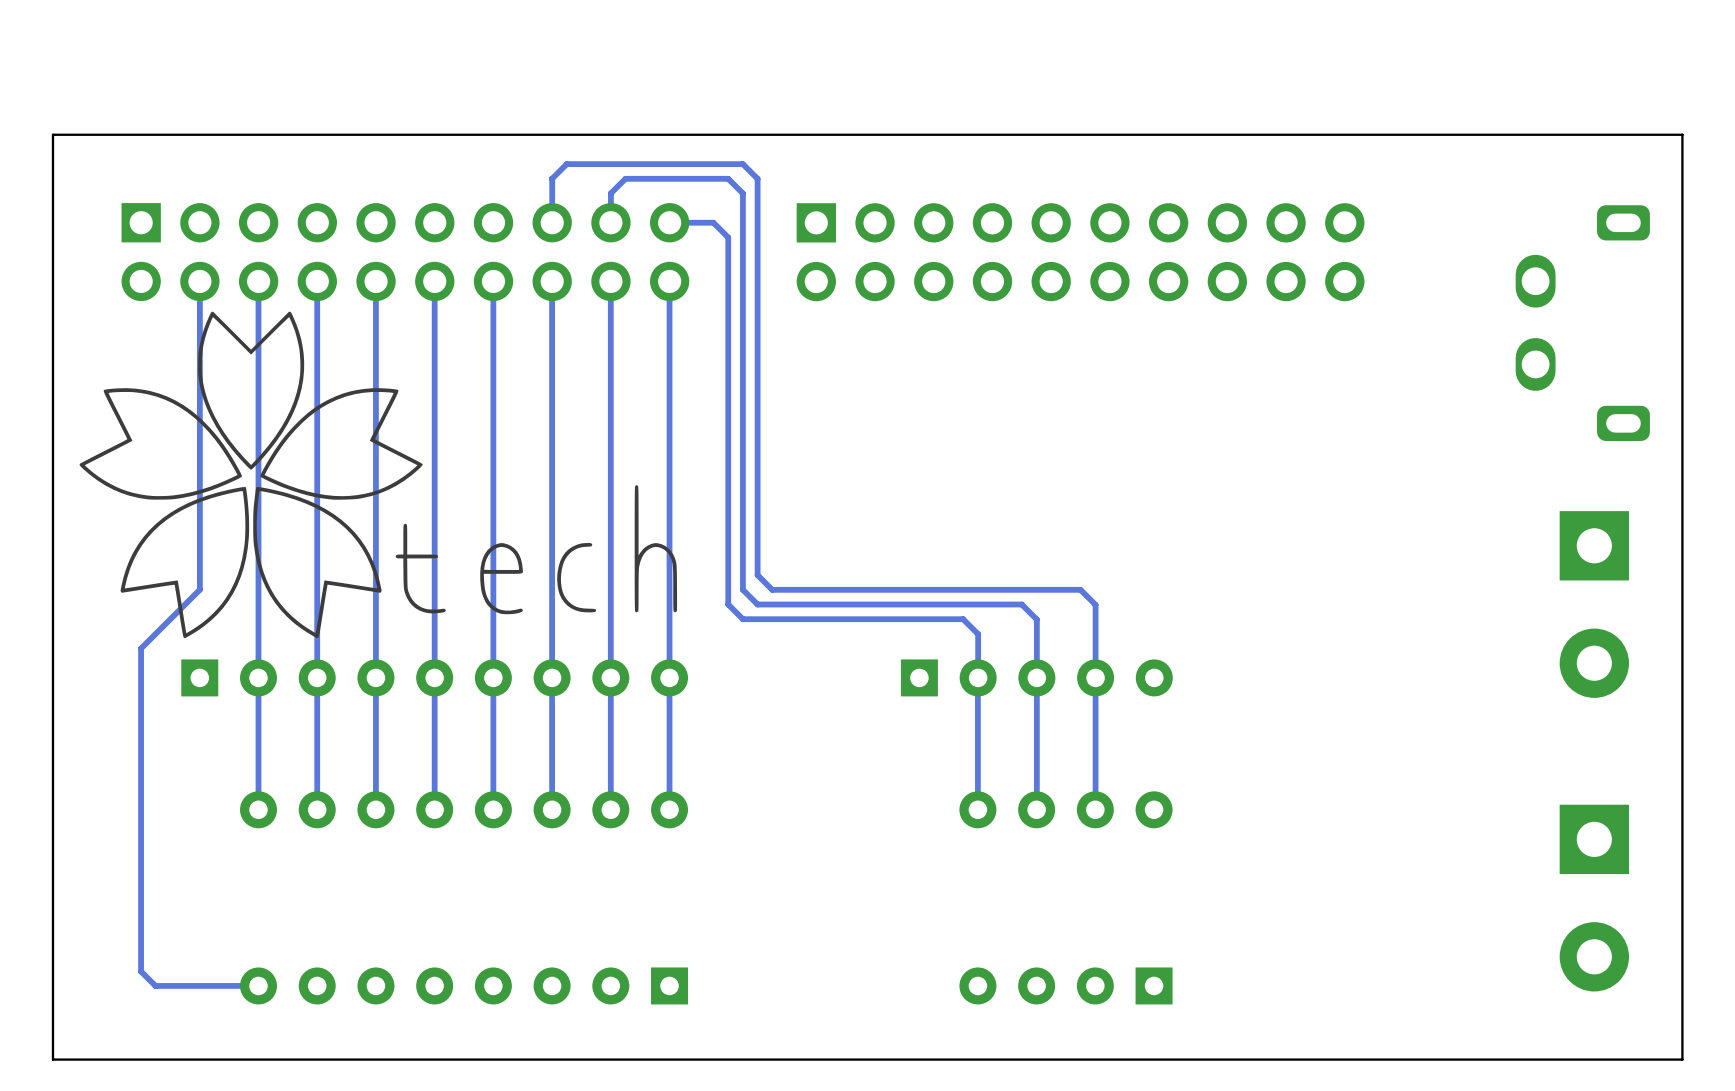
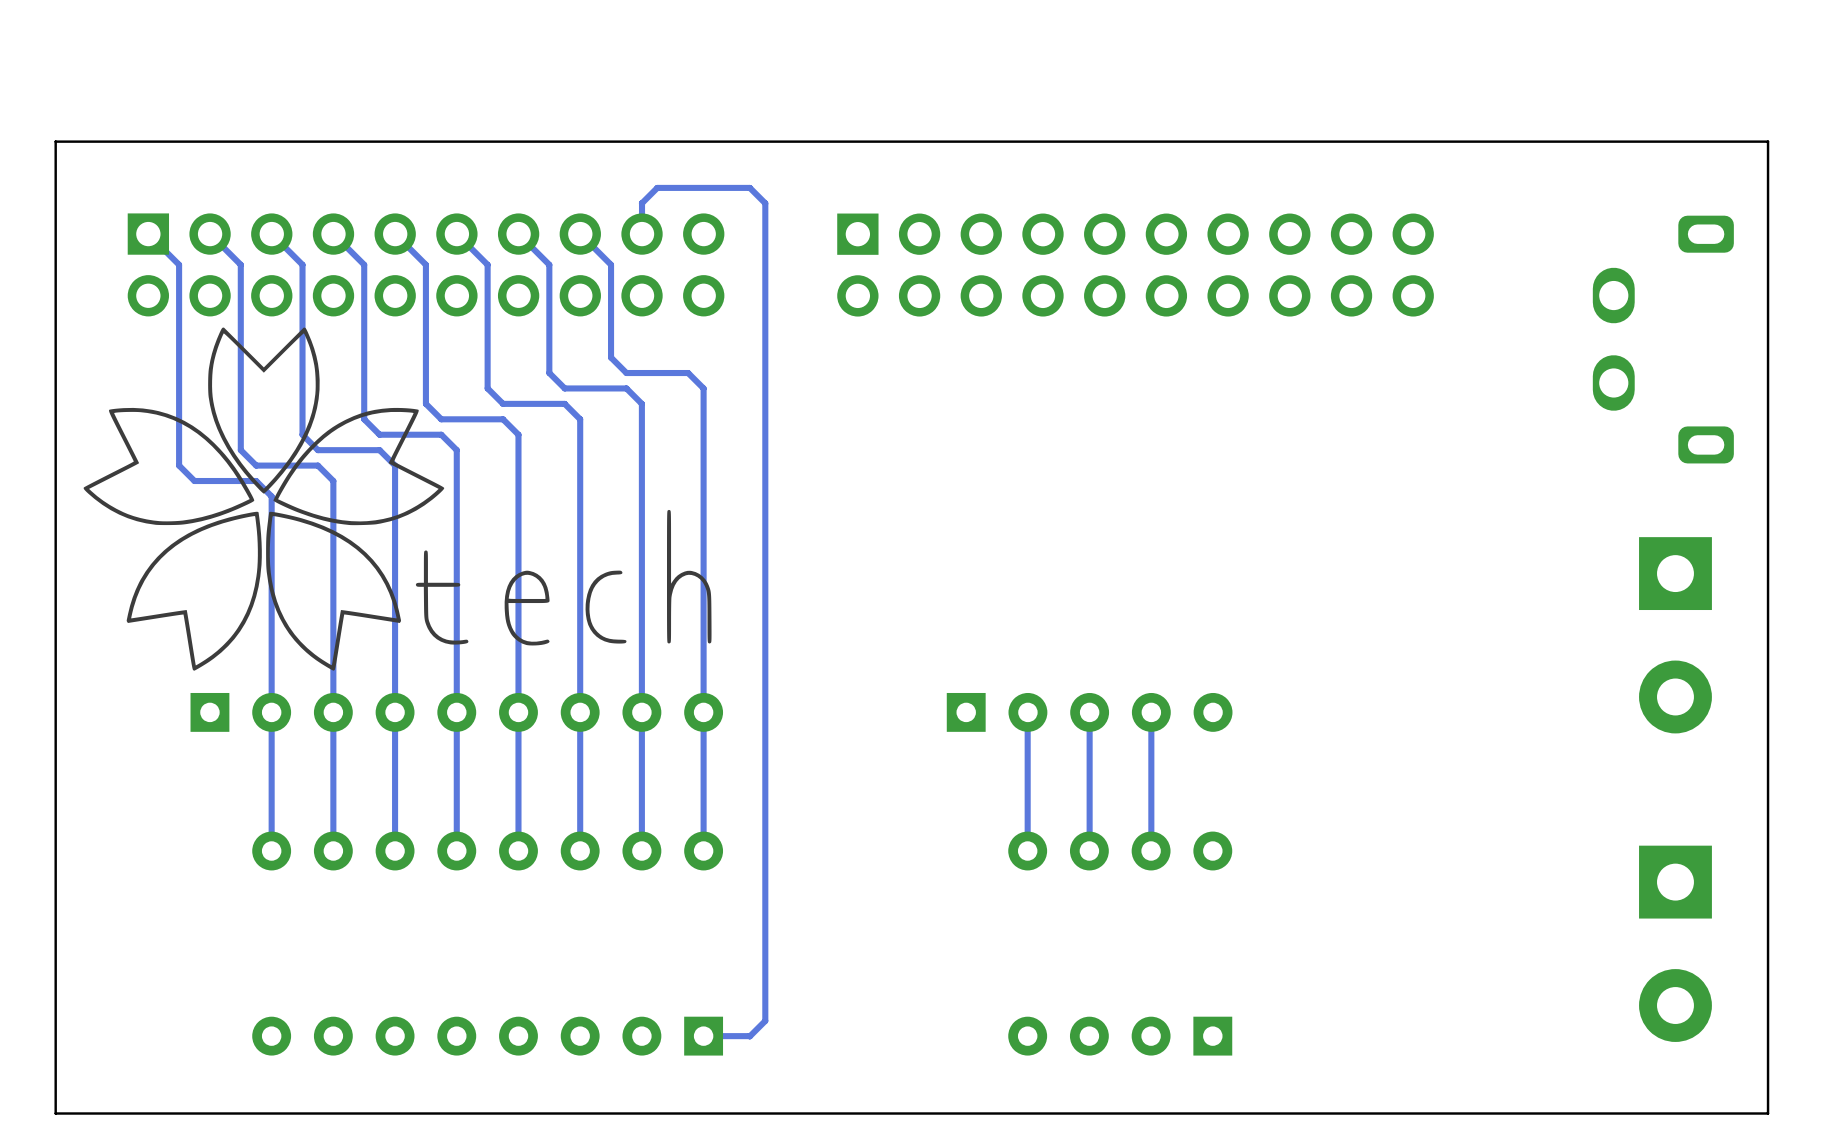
track: (552, 178) (552, 222) -> none
track: (552, 178) (566, 164) (742, 164) (757, 178) (757, 575) (772, 589) (1080, 589) (1095, 604) (1095, 677) -> none
track: (713, 178) (728, 178) (742, 193) (742, 589) (757, 604) (1021, 604) (1036, 619) (1036, 677) -> none
track: (669, 222) (713, 222) (728, 237) -> (749, 187) (765, 203) (765, 249)
track: (199, 281) (199, 589) (141, 648) (141, 971) (155, 986) -> none
track: (258, 281) (258, 472) -> (148, 234) (179, 264) (179, 465) (194, 481) (256, 481) (271, 496)
track: (317, 281) (317, 457) -> (210, 234) (240, 264) (240, 450) (256, 465) (317, 465) (333, 481)
track: (375, 281) (375, 443) -> (271, 234) (302, 264) (302, 434) (317, 450) (379, 450) (395, 465)
track: (434, 281) (434, 428) -> (333, 234) (364, 264) (364, 419) (379, 434) (441, 434) (456, 450)
track: (493, 281) (493, 413) -> (395, 234) (425, 264) (425, 403) (441, 419) (503, 419) (518, 434)
track: (552, 281) (552, 399) -> (456, 234) (487, 264) (487, 388) (503, 403) (564, 403) (580, 419)
track: (610, 281) (610, 384) -> (518, 234) (549, 264) (549, 373) (564, 388) (626, 388) (641, 403)
track: (669, 281) (669, 369) -> (580, 234) (611, 264) (611, 357) (626, 373) (688, 373) (703, 388)
track: (728, 604) (742, 619) (963, 619) (978, 634) (977, 678) -> (765, 635) (765, 1020) (749, 1036)
track: (258, 985) (155, 985) -> none
track: none -> (749, 1036) (703, 1036)

